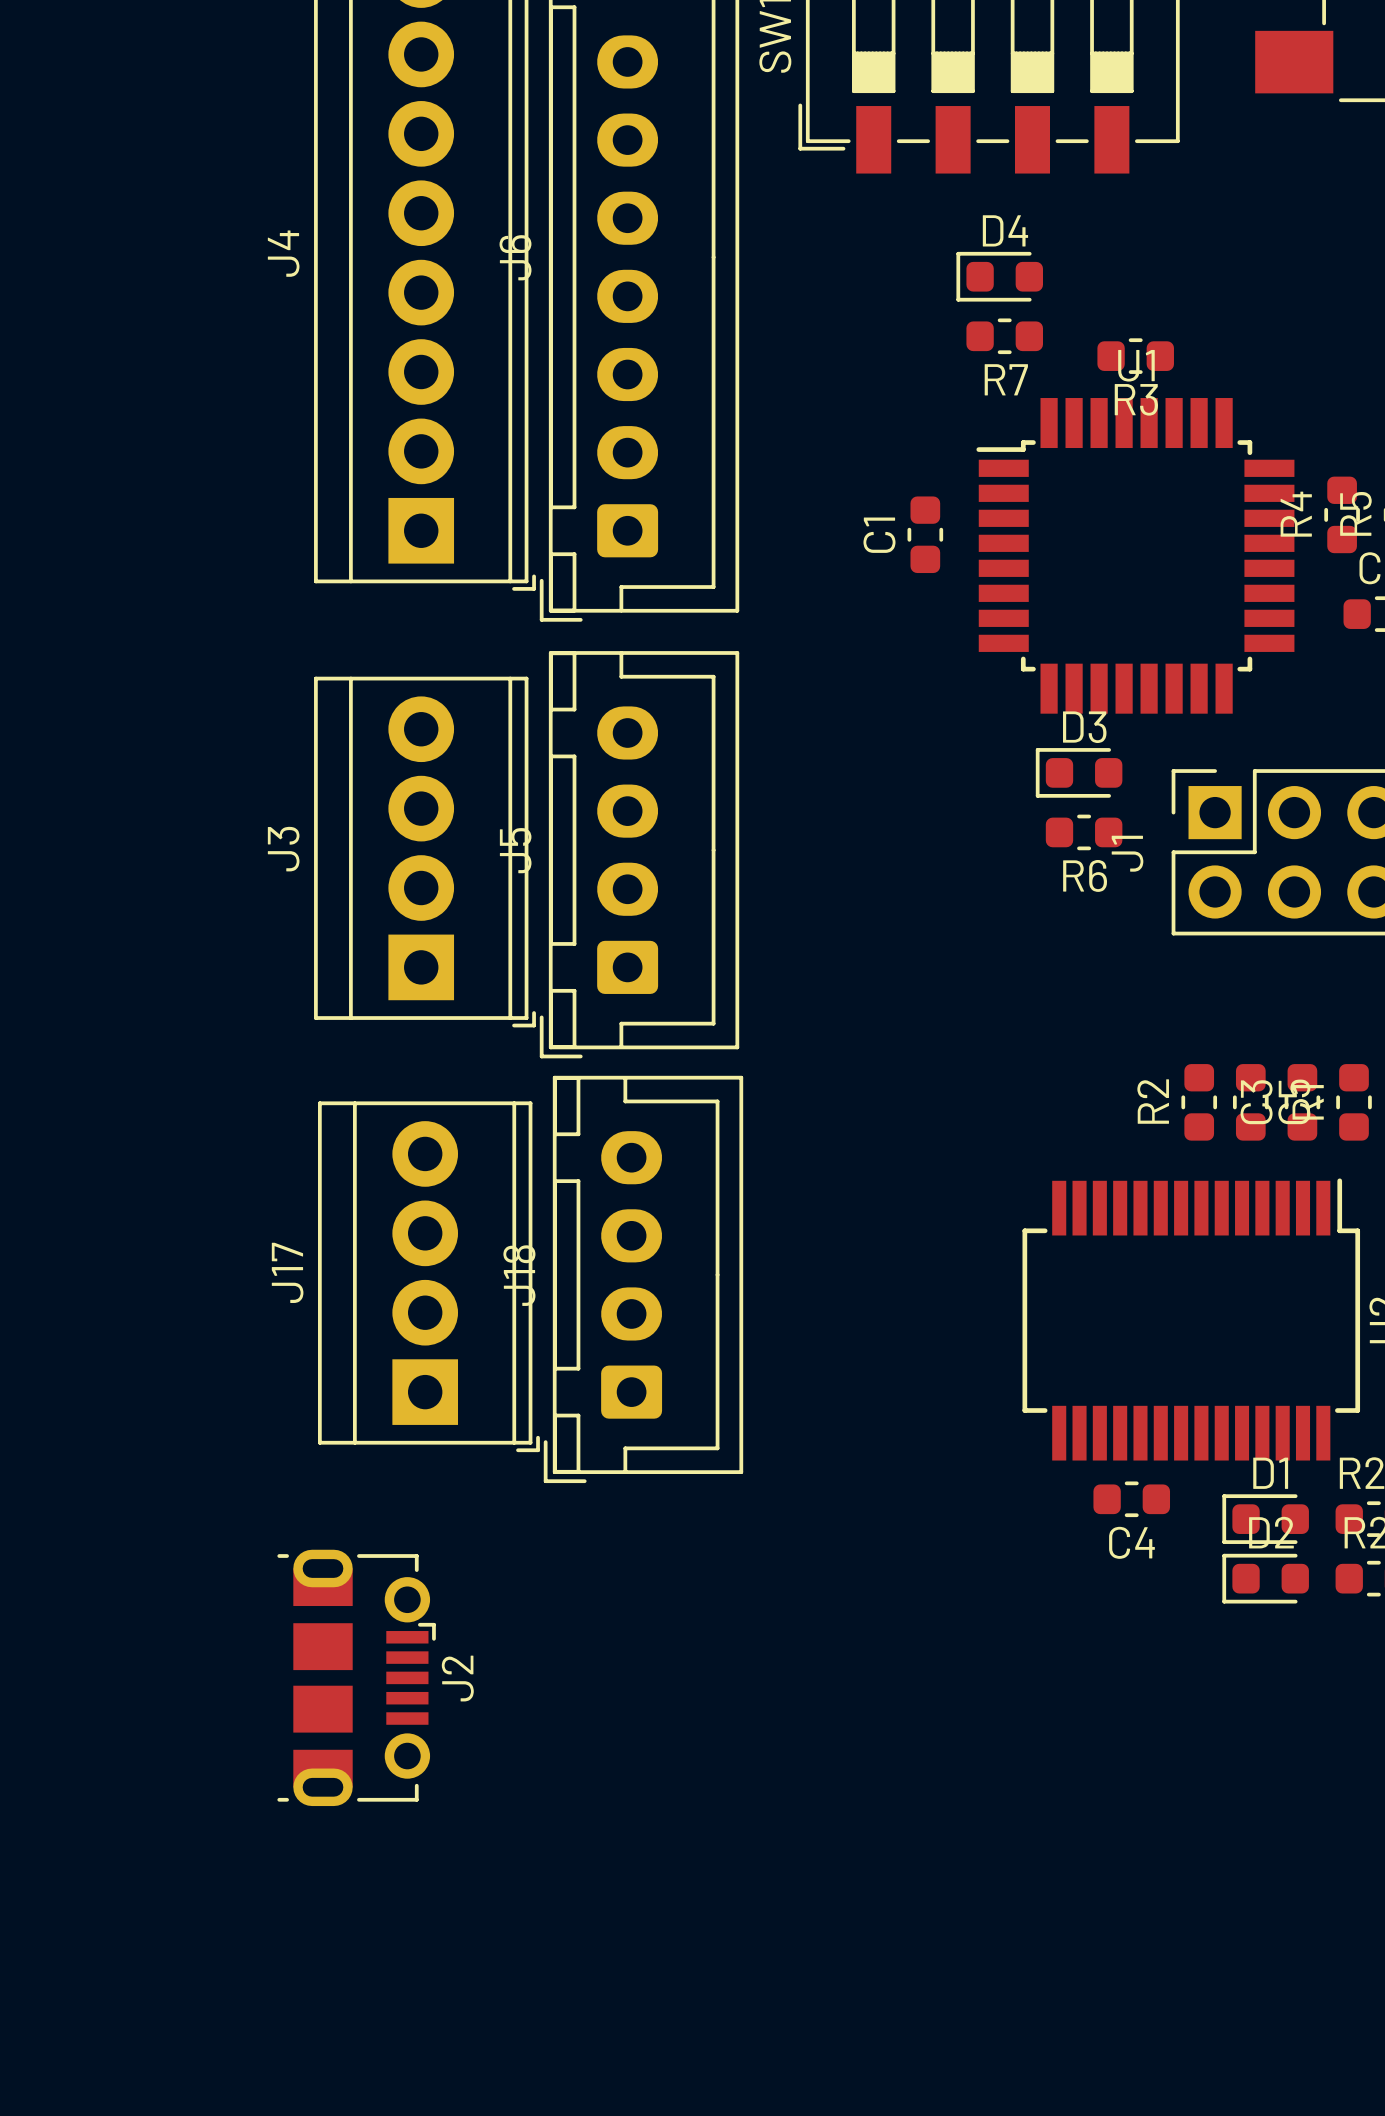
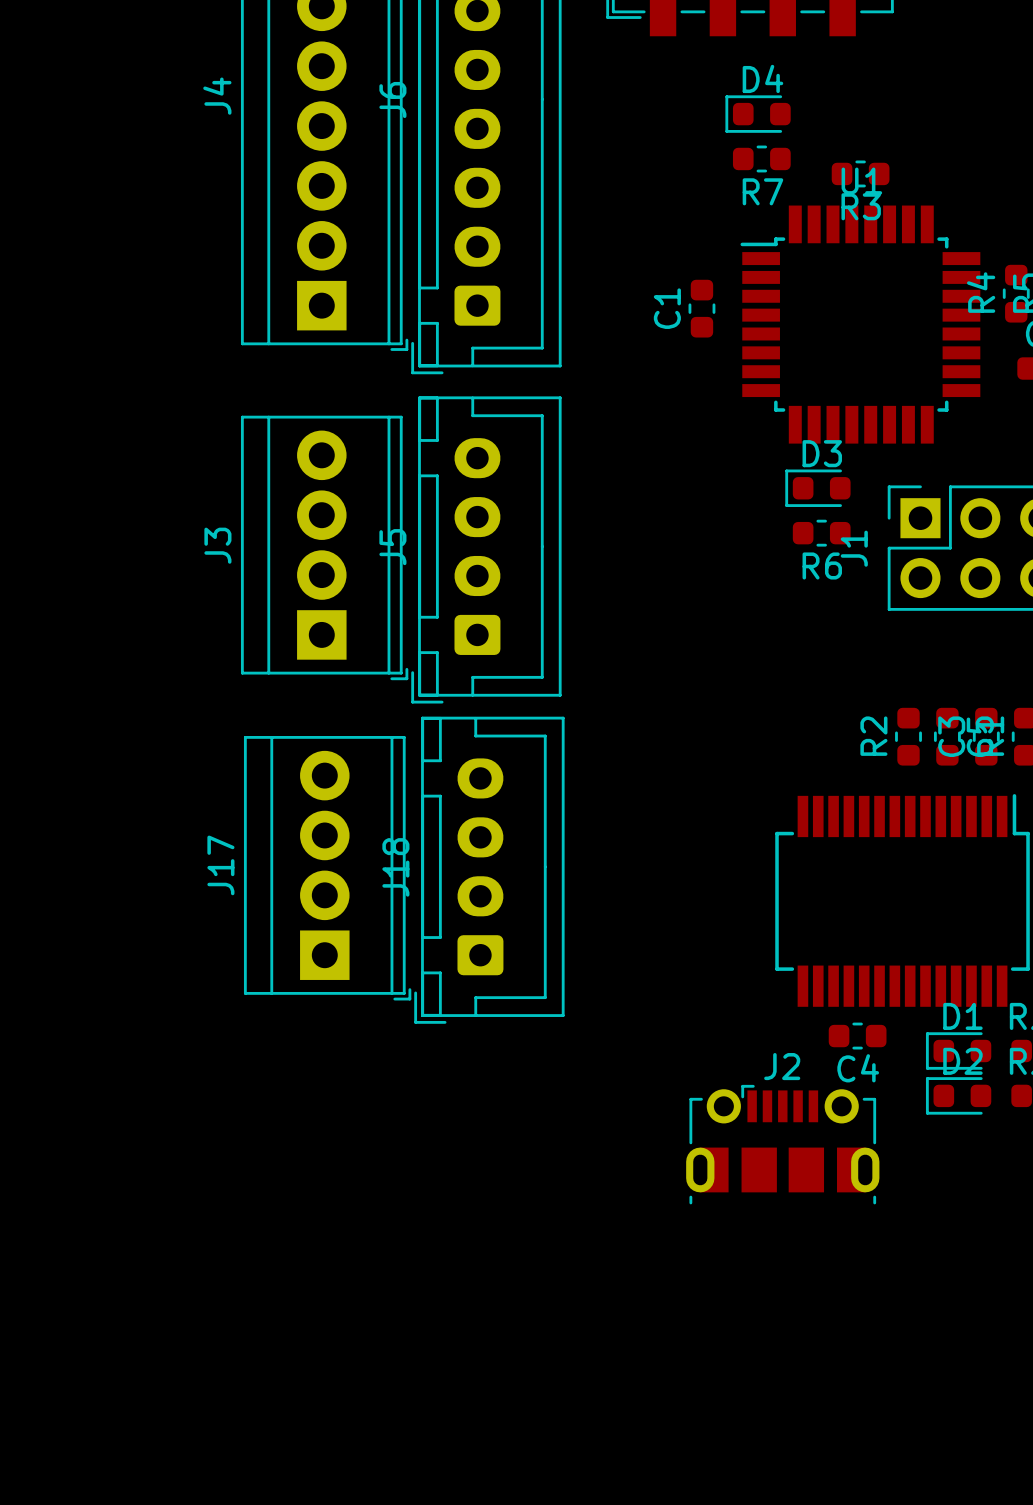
J2 rotation: 0° (356, 1677) -> 90° counterclockwise (782, 1144)
J2 position: (356, 1677) -> (782, 1144)

